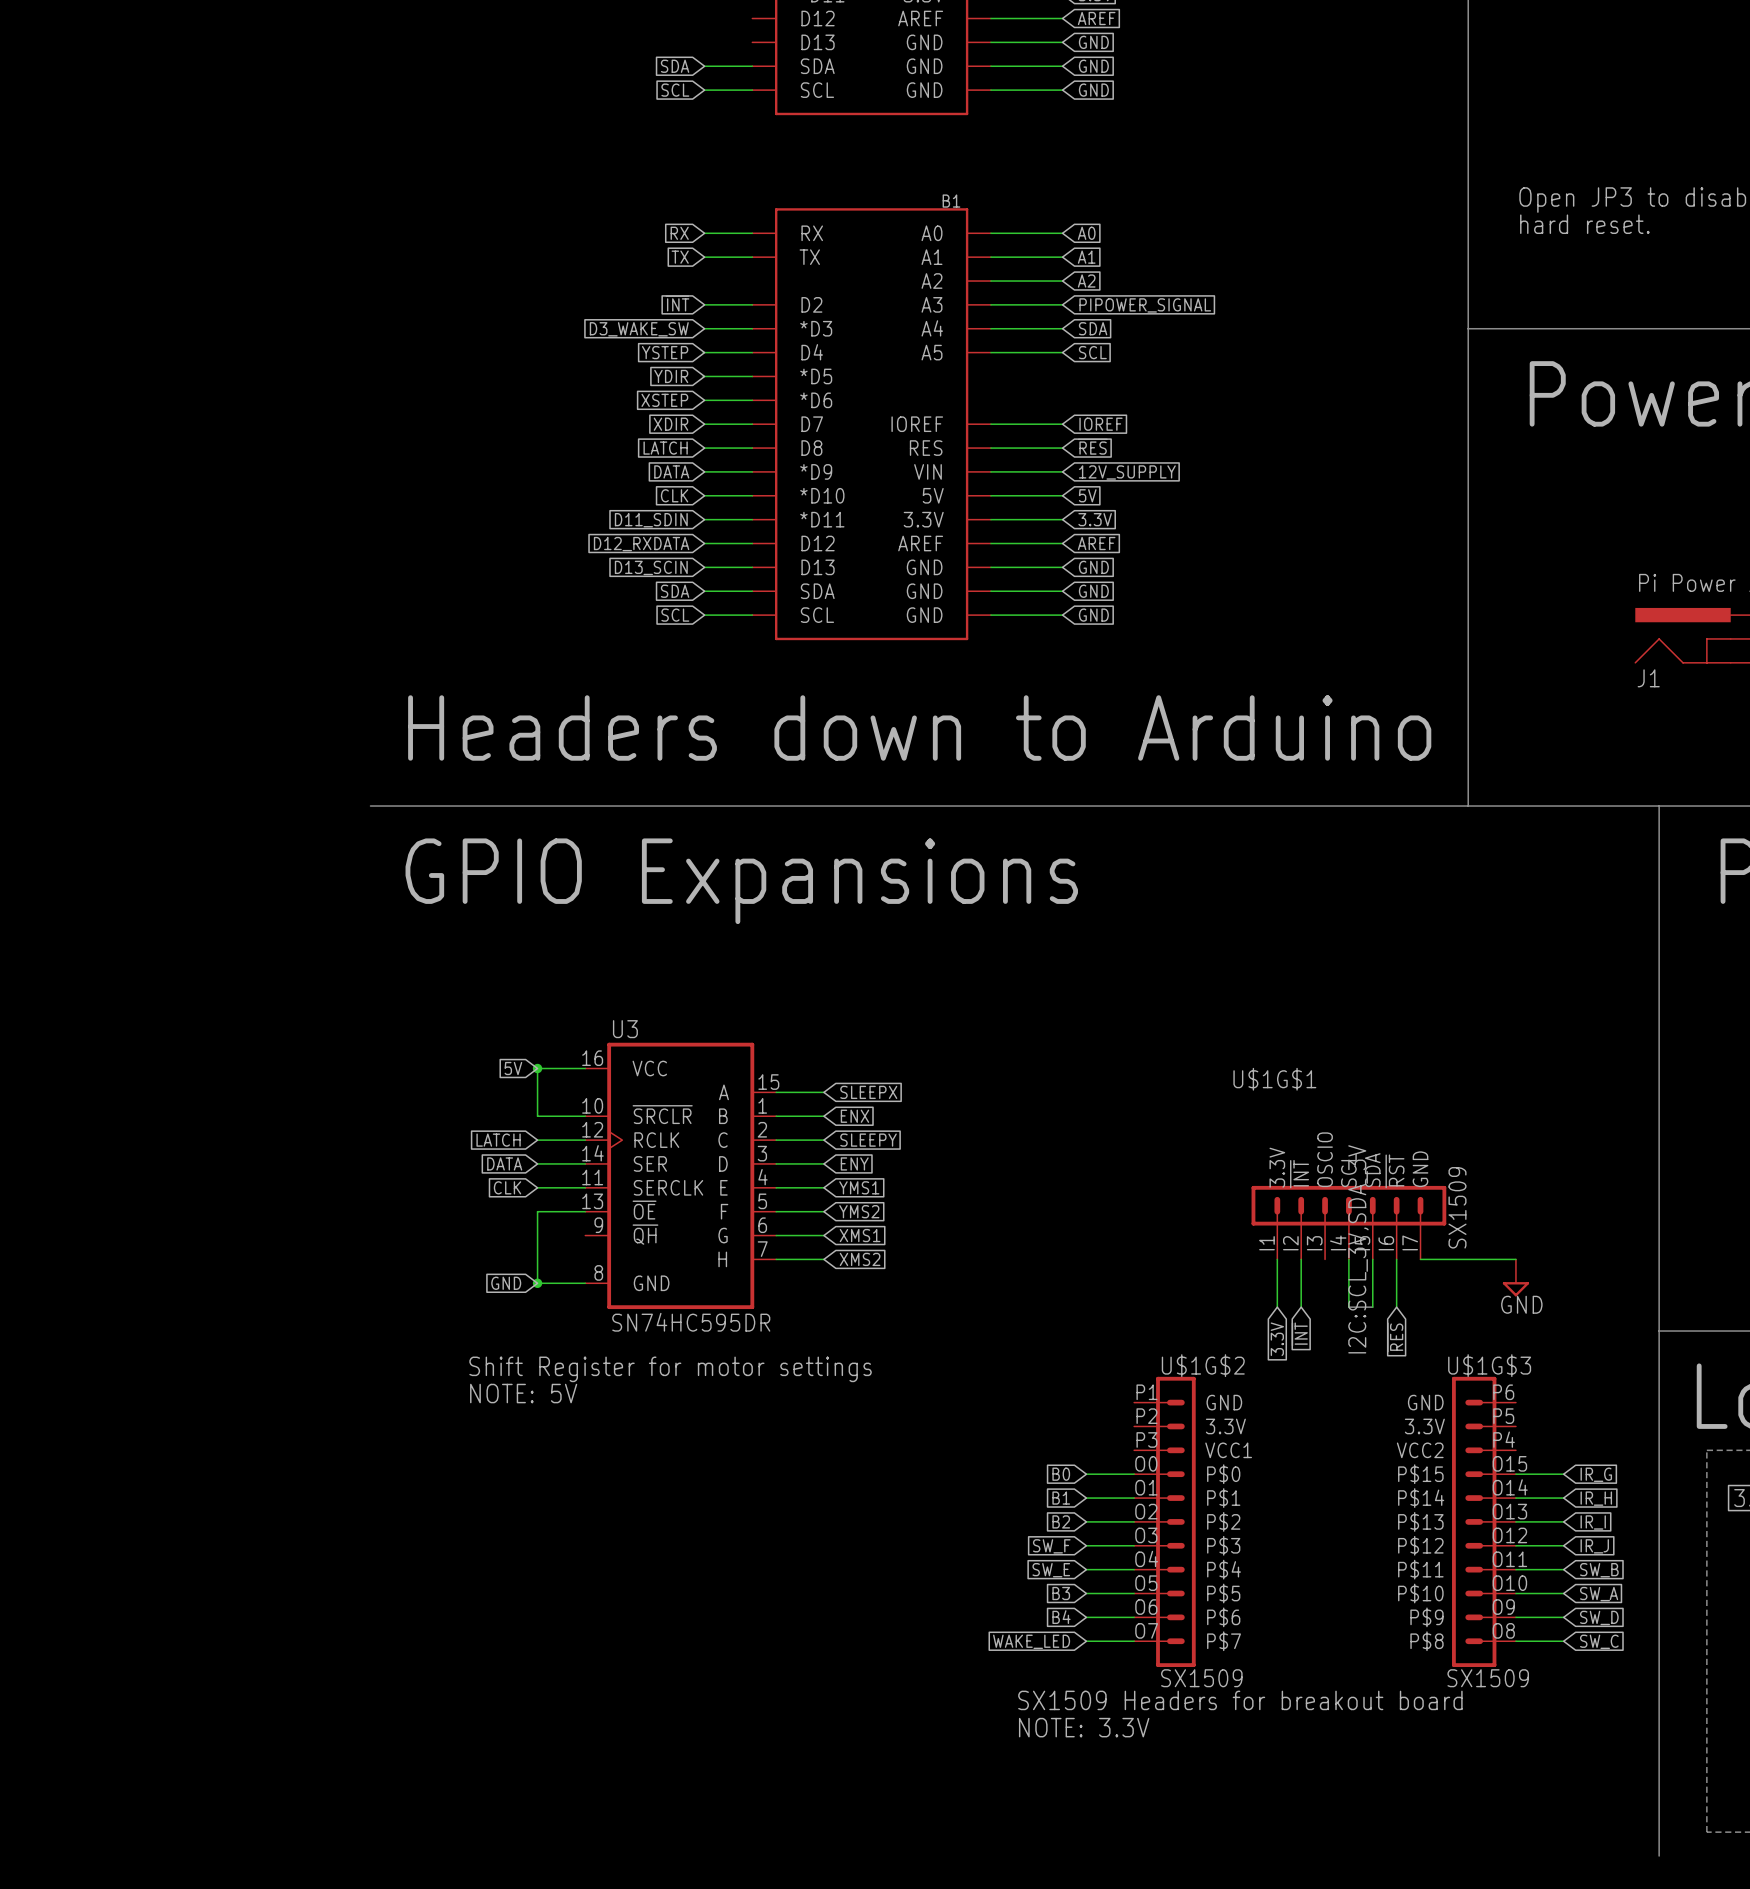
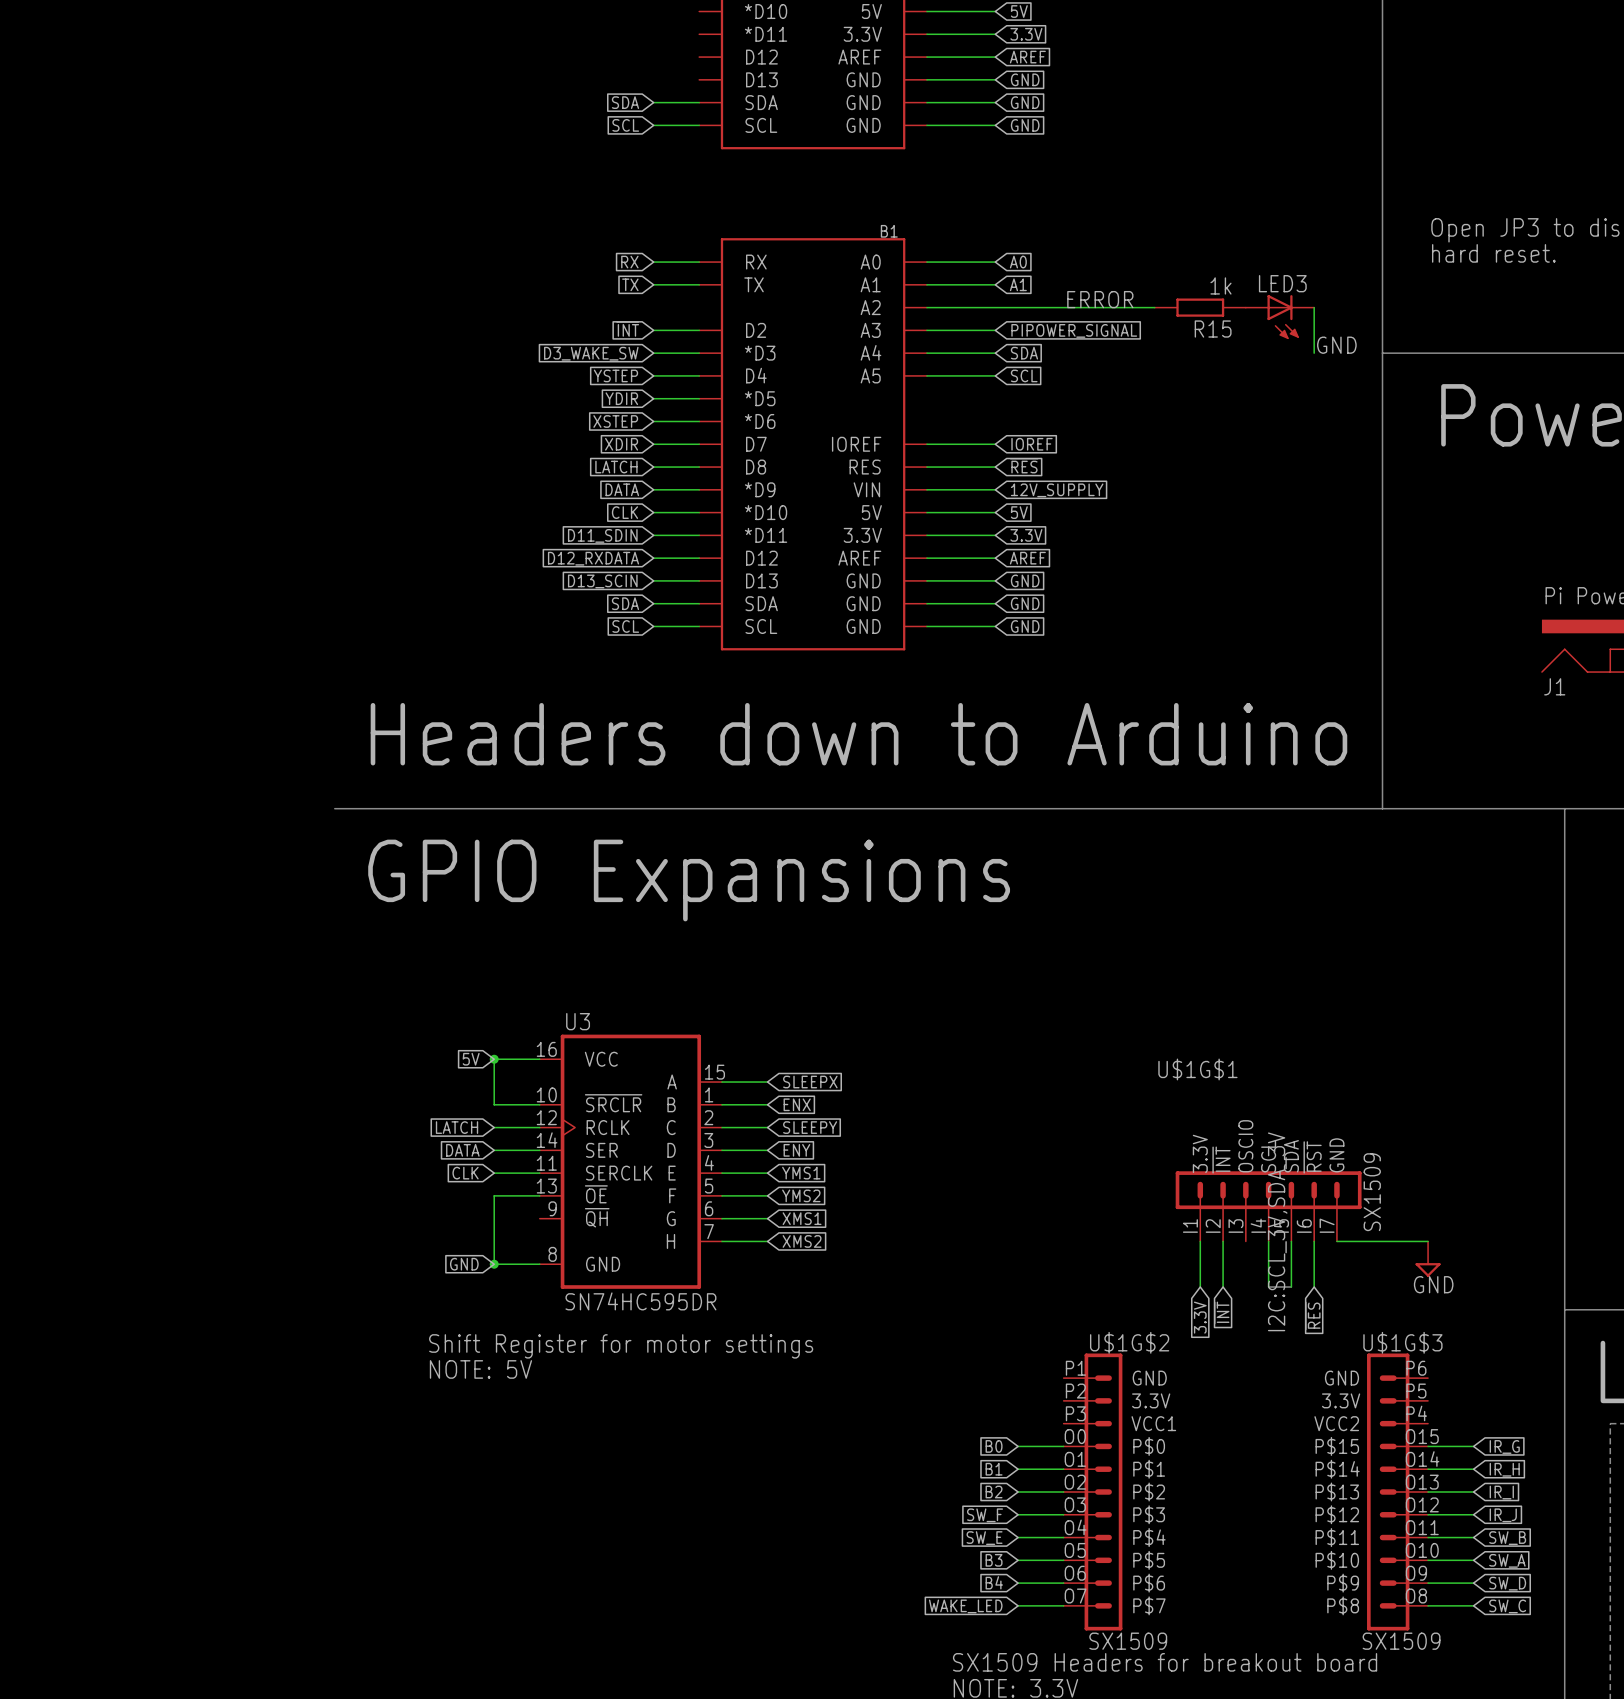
label: none -> ERROR (1100, 299)
wire: none -> (995, 307) (1154, 307)
global label: A2 (1086, 281) -> none
R15: none -> 1k (1200, 307)
wire: none -> (1314, 307) (1314, 353)
LED3: none -> (1280, 317)
label: none -> GND (1336, 345)

